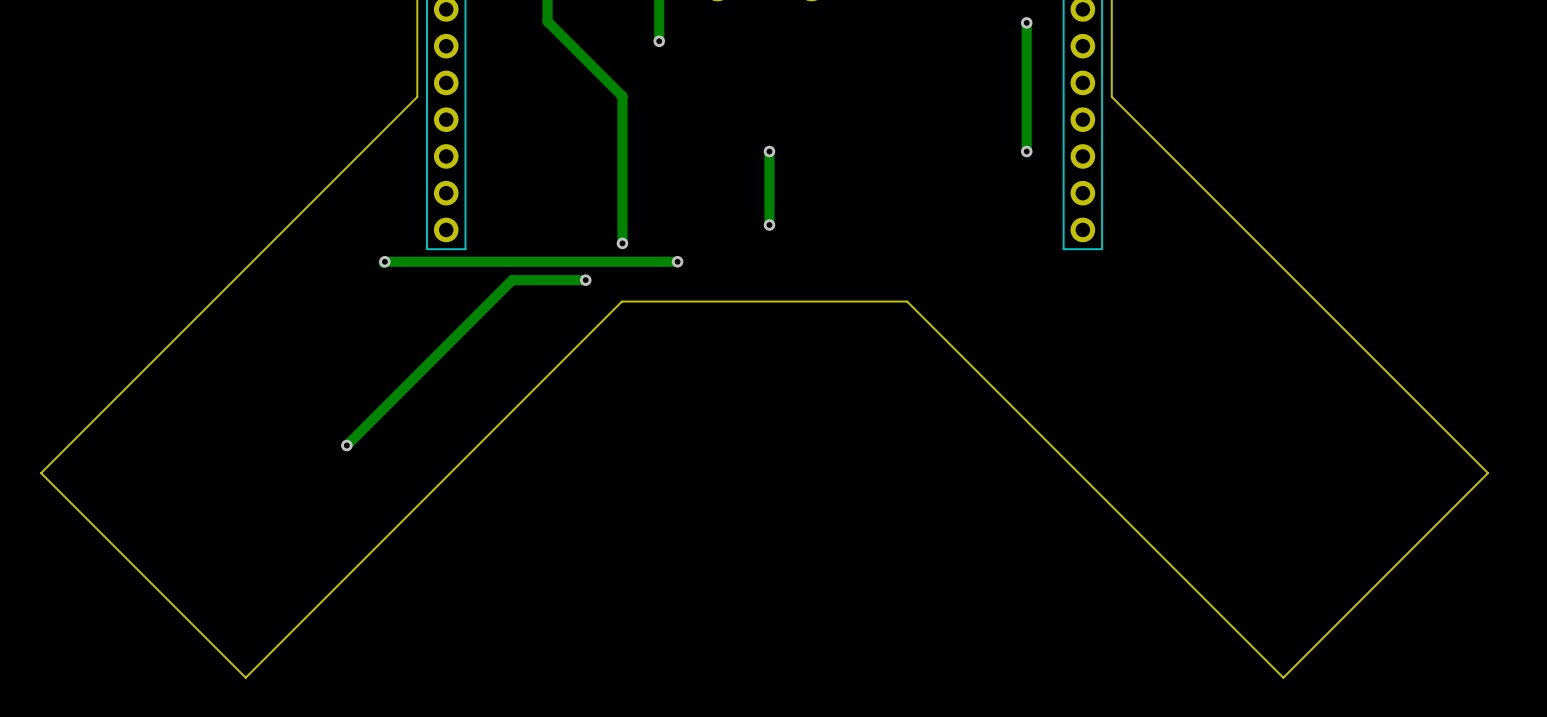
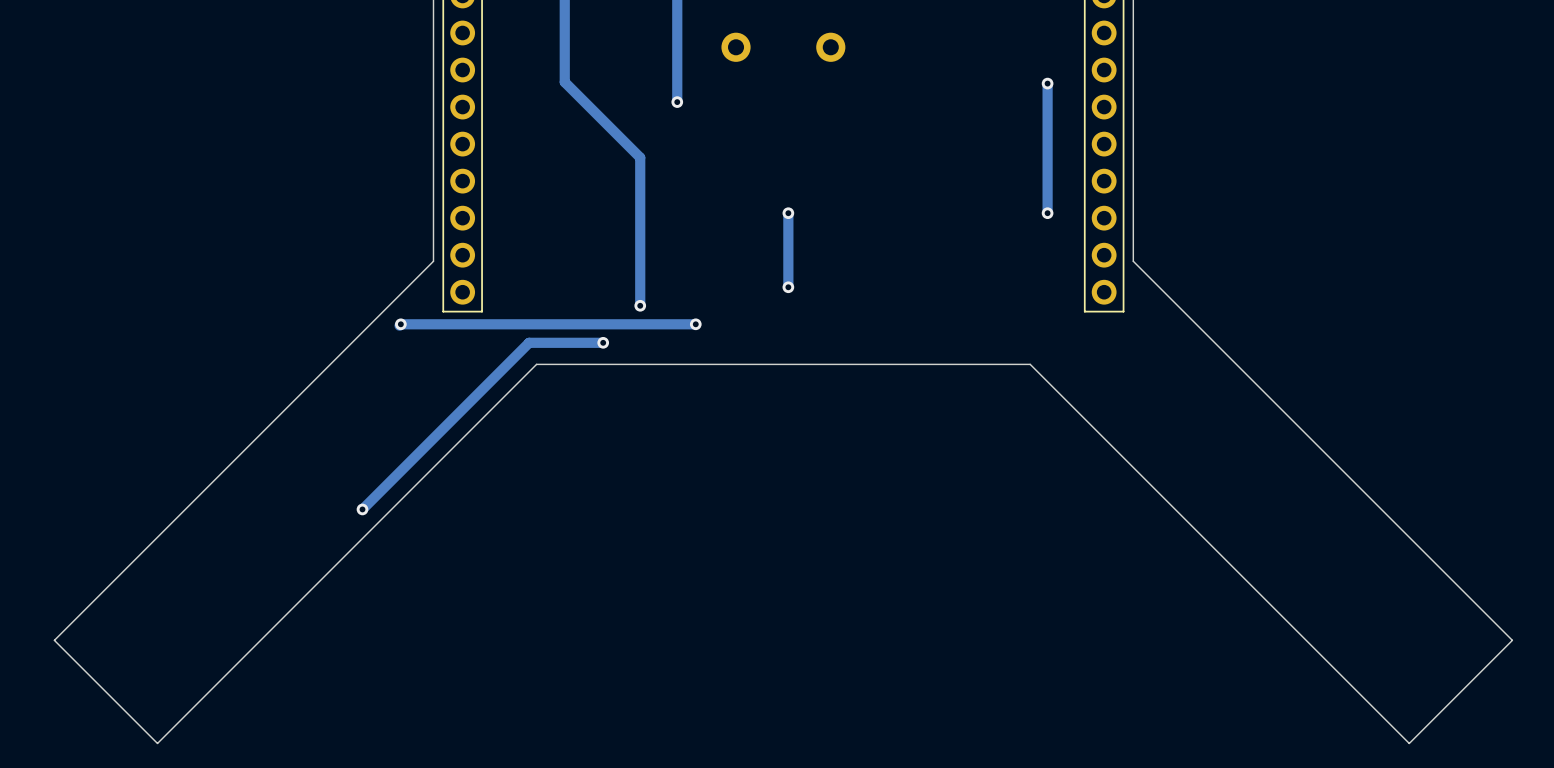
board edge: (417, 96) (41, 473) (245, 677) (621, 301) -> (433, 158) (433, 261) (54, 640) (157, 743) (536, 364) (639, 364)
board edge: (1111, 96) (1487, 473) (1283, 677) (907, 301) -> (1133, 158) (1133, 261) (1512, 640) (1409, 743) (1030, 364) (927, 364)

